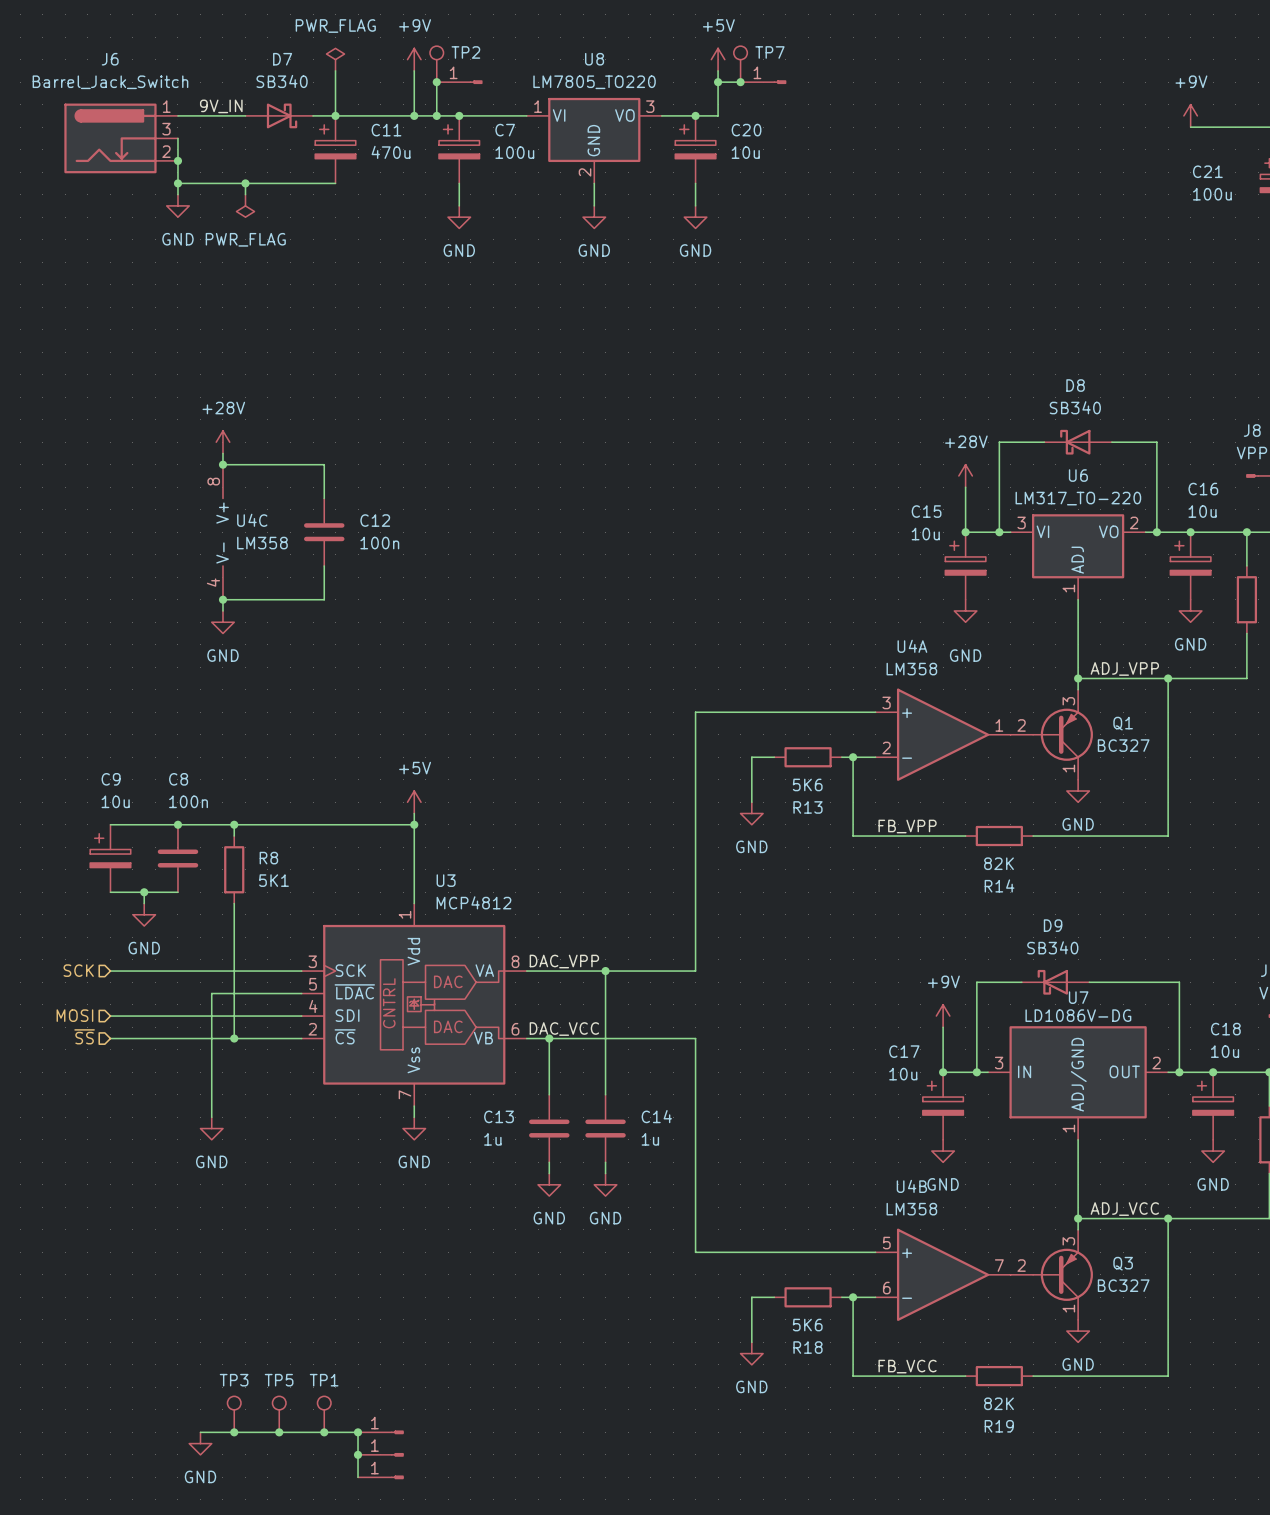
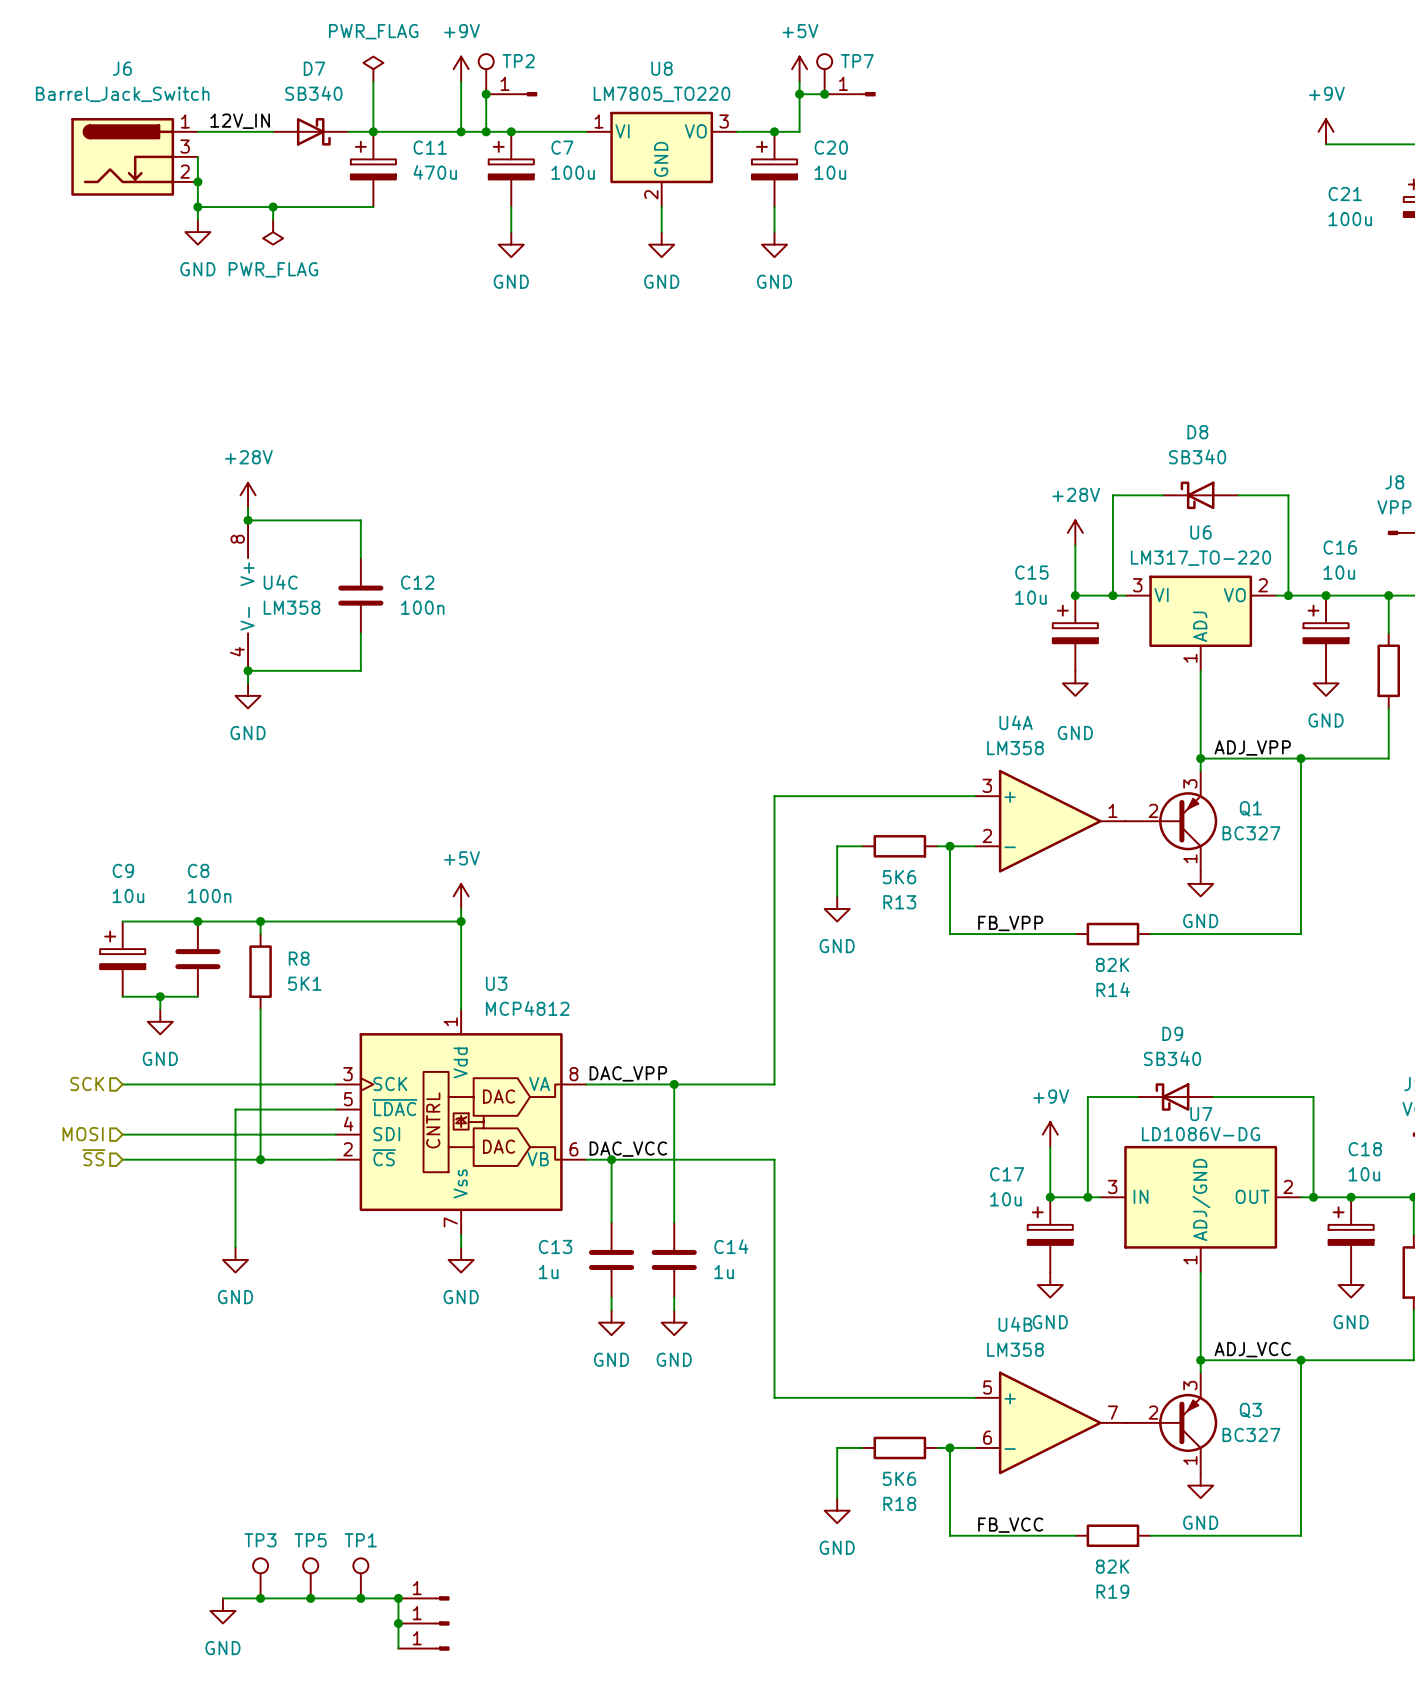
label: 9V_IN (221, 106) -> 12V_IN (240, 121)
Q1 symbol: [1010, 689, 1093, 780] -> [1125, 771, 1218, 872]
Q3 symbol: [1010, 1229, 1093, 1320] -> [1125, 1372, 1218, 1474]

